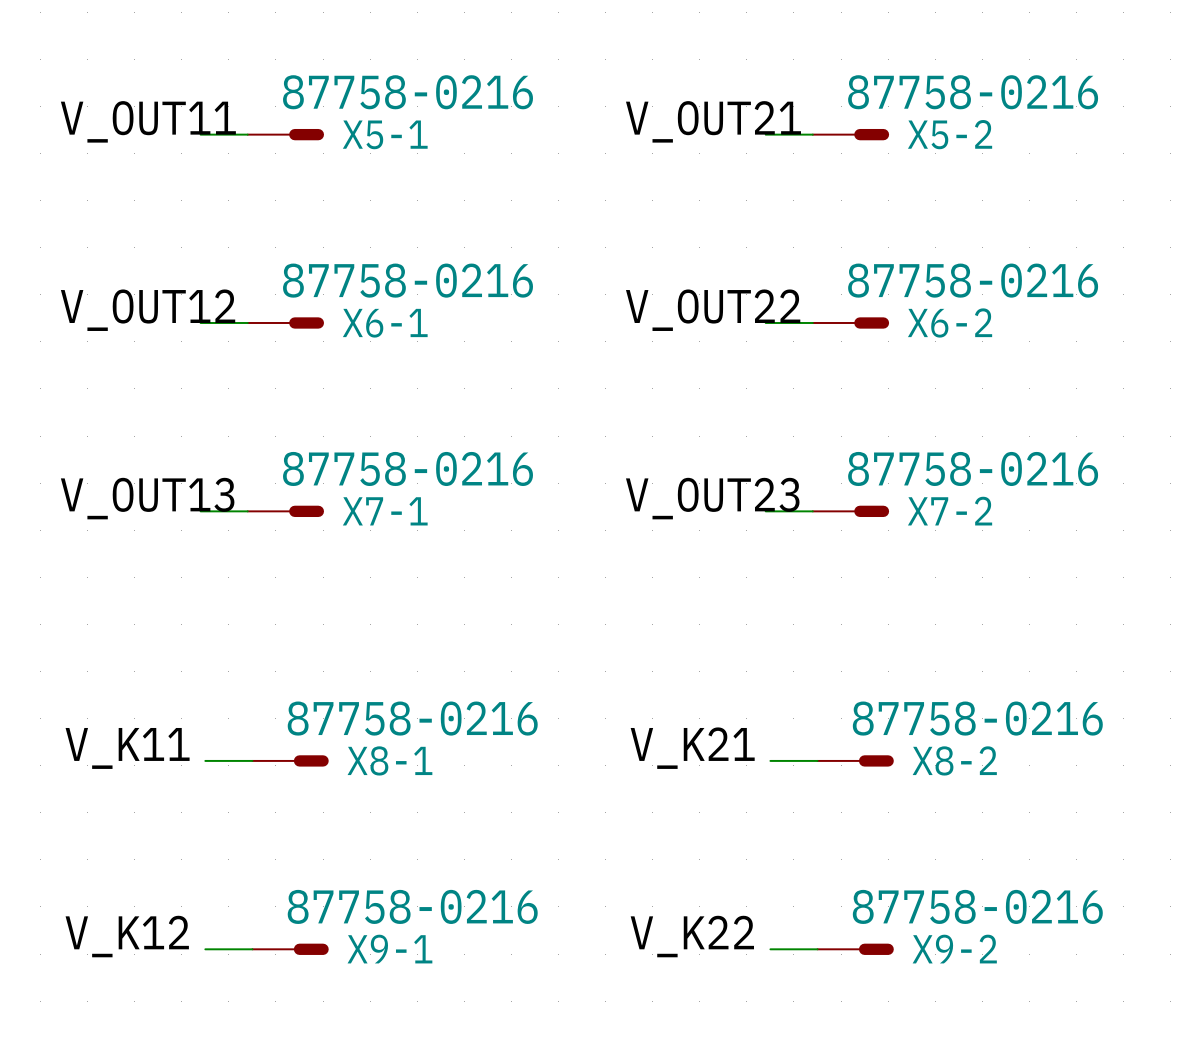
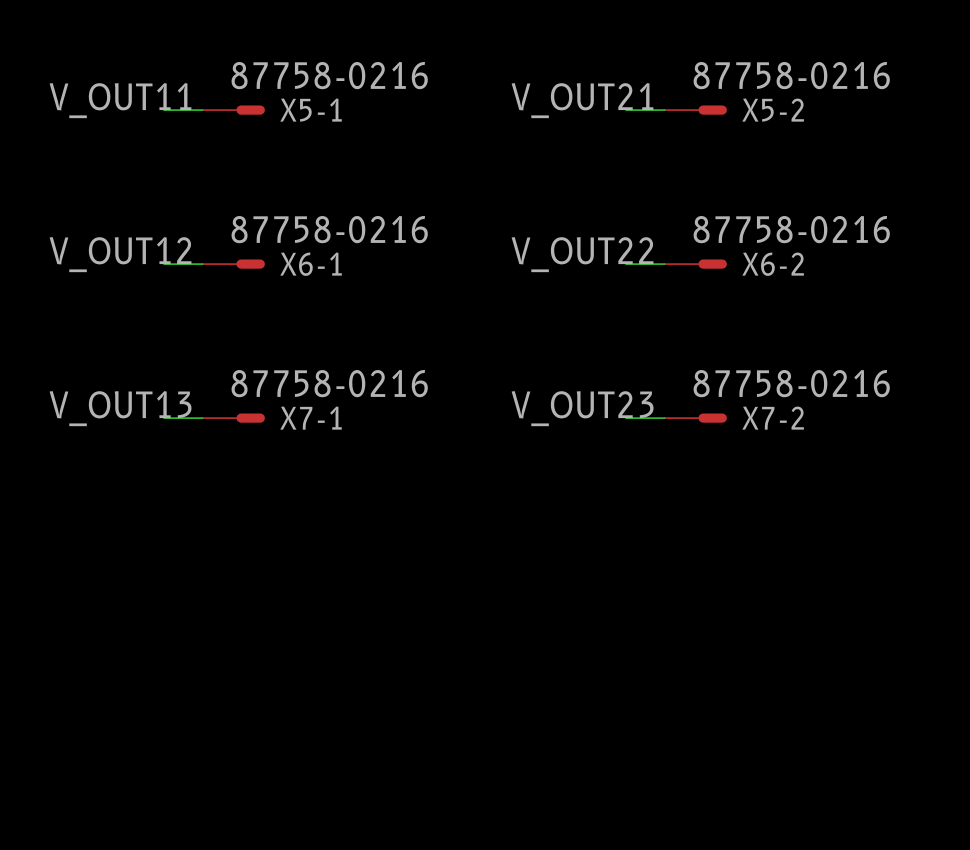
label: V_K11 (127, 748) -> none
label: V_K21 (692, 748) -> none
wire: (205, 760) (252, 760) -> none
X8-1: 87758-0216 (290, 760) -> none
wire: (770, 760) (817, 760) -> none
X8-2: 87758-0216 (855, 760) -> none
label: V_K12 (127, 936) -> none
label: V_K22 (692, 936) -> none
wire: (205, 949) (252, 949) -> none
X9-1: 87758-0216 (290, 949) -> none
wire: (770, 949) (817, 949) -> none
X9-2: 87758-0216 (855, 949) -> none

